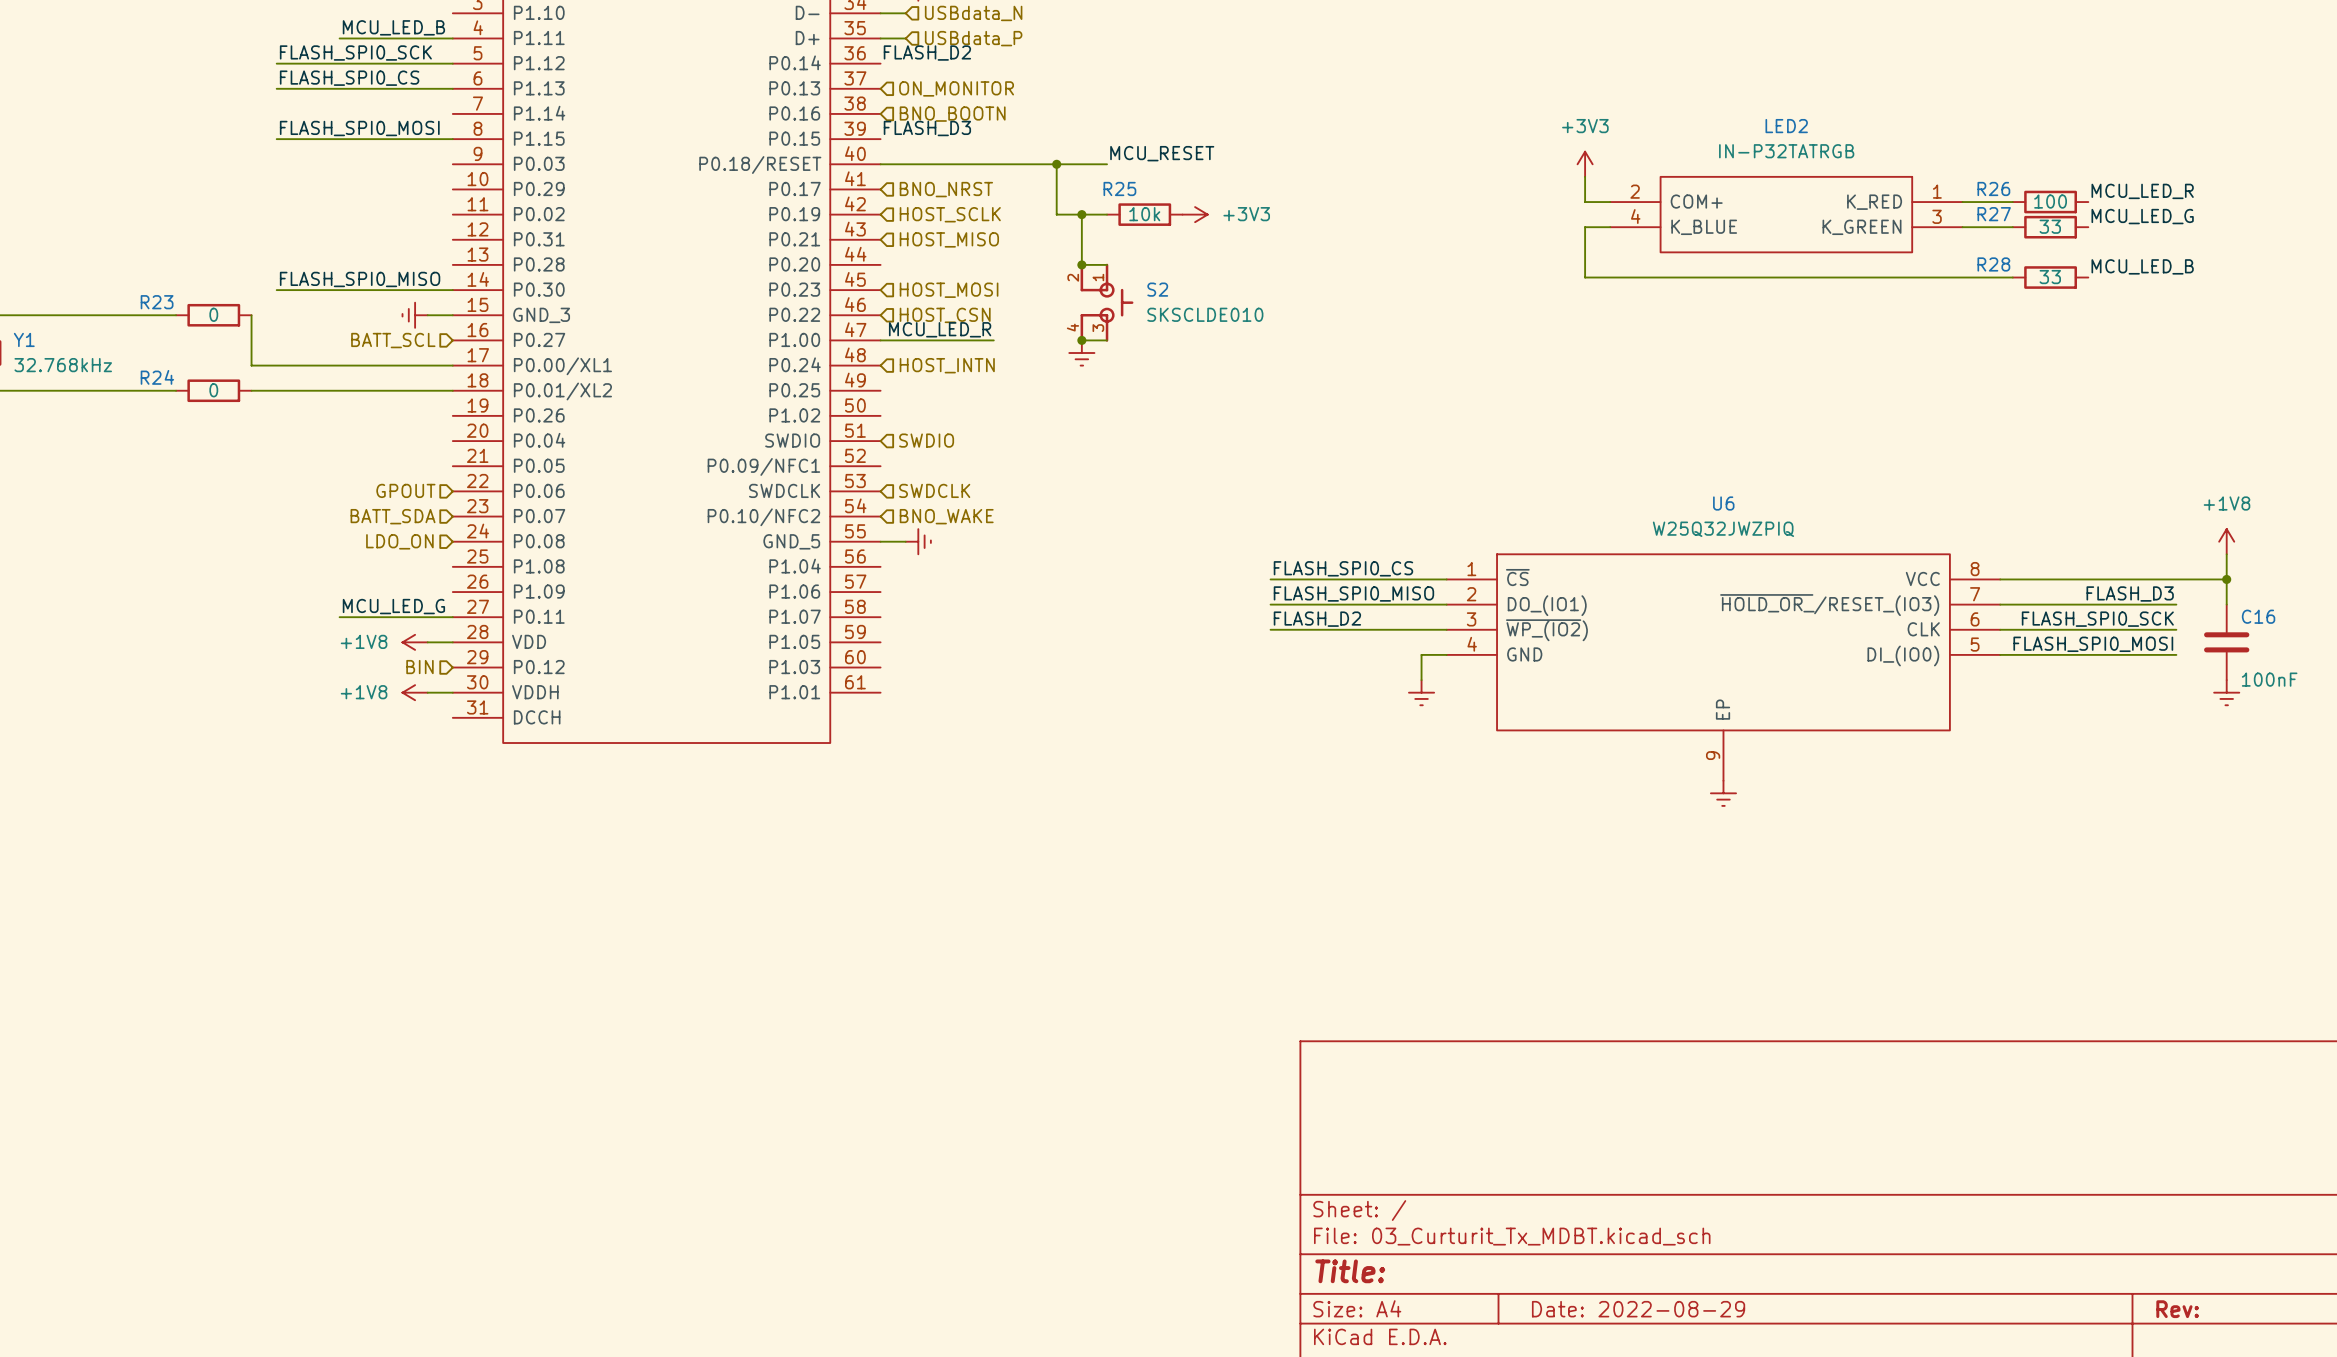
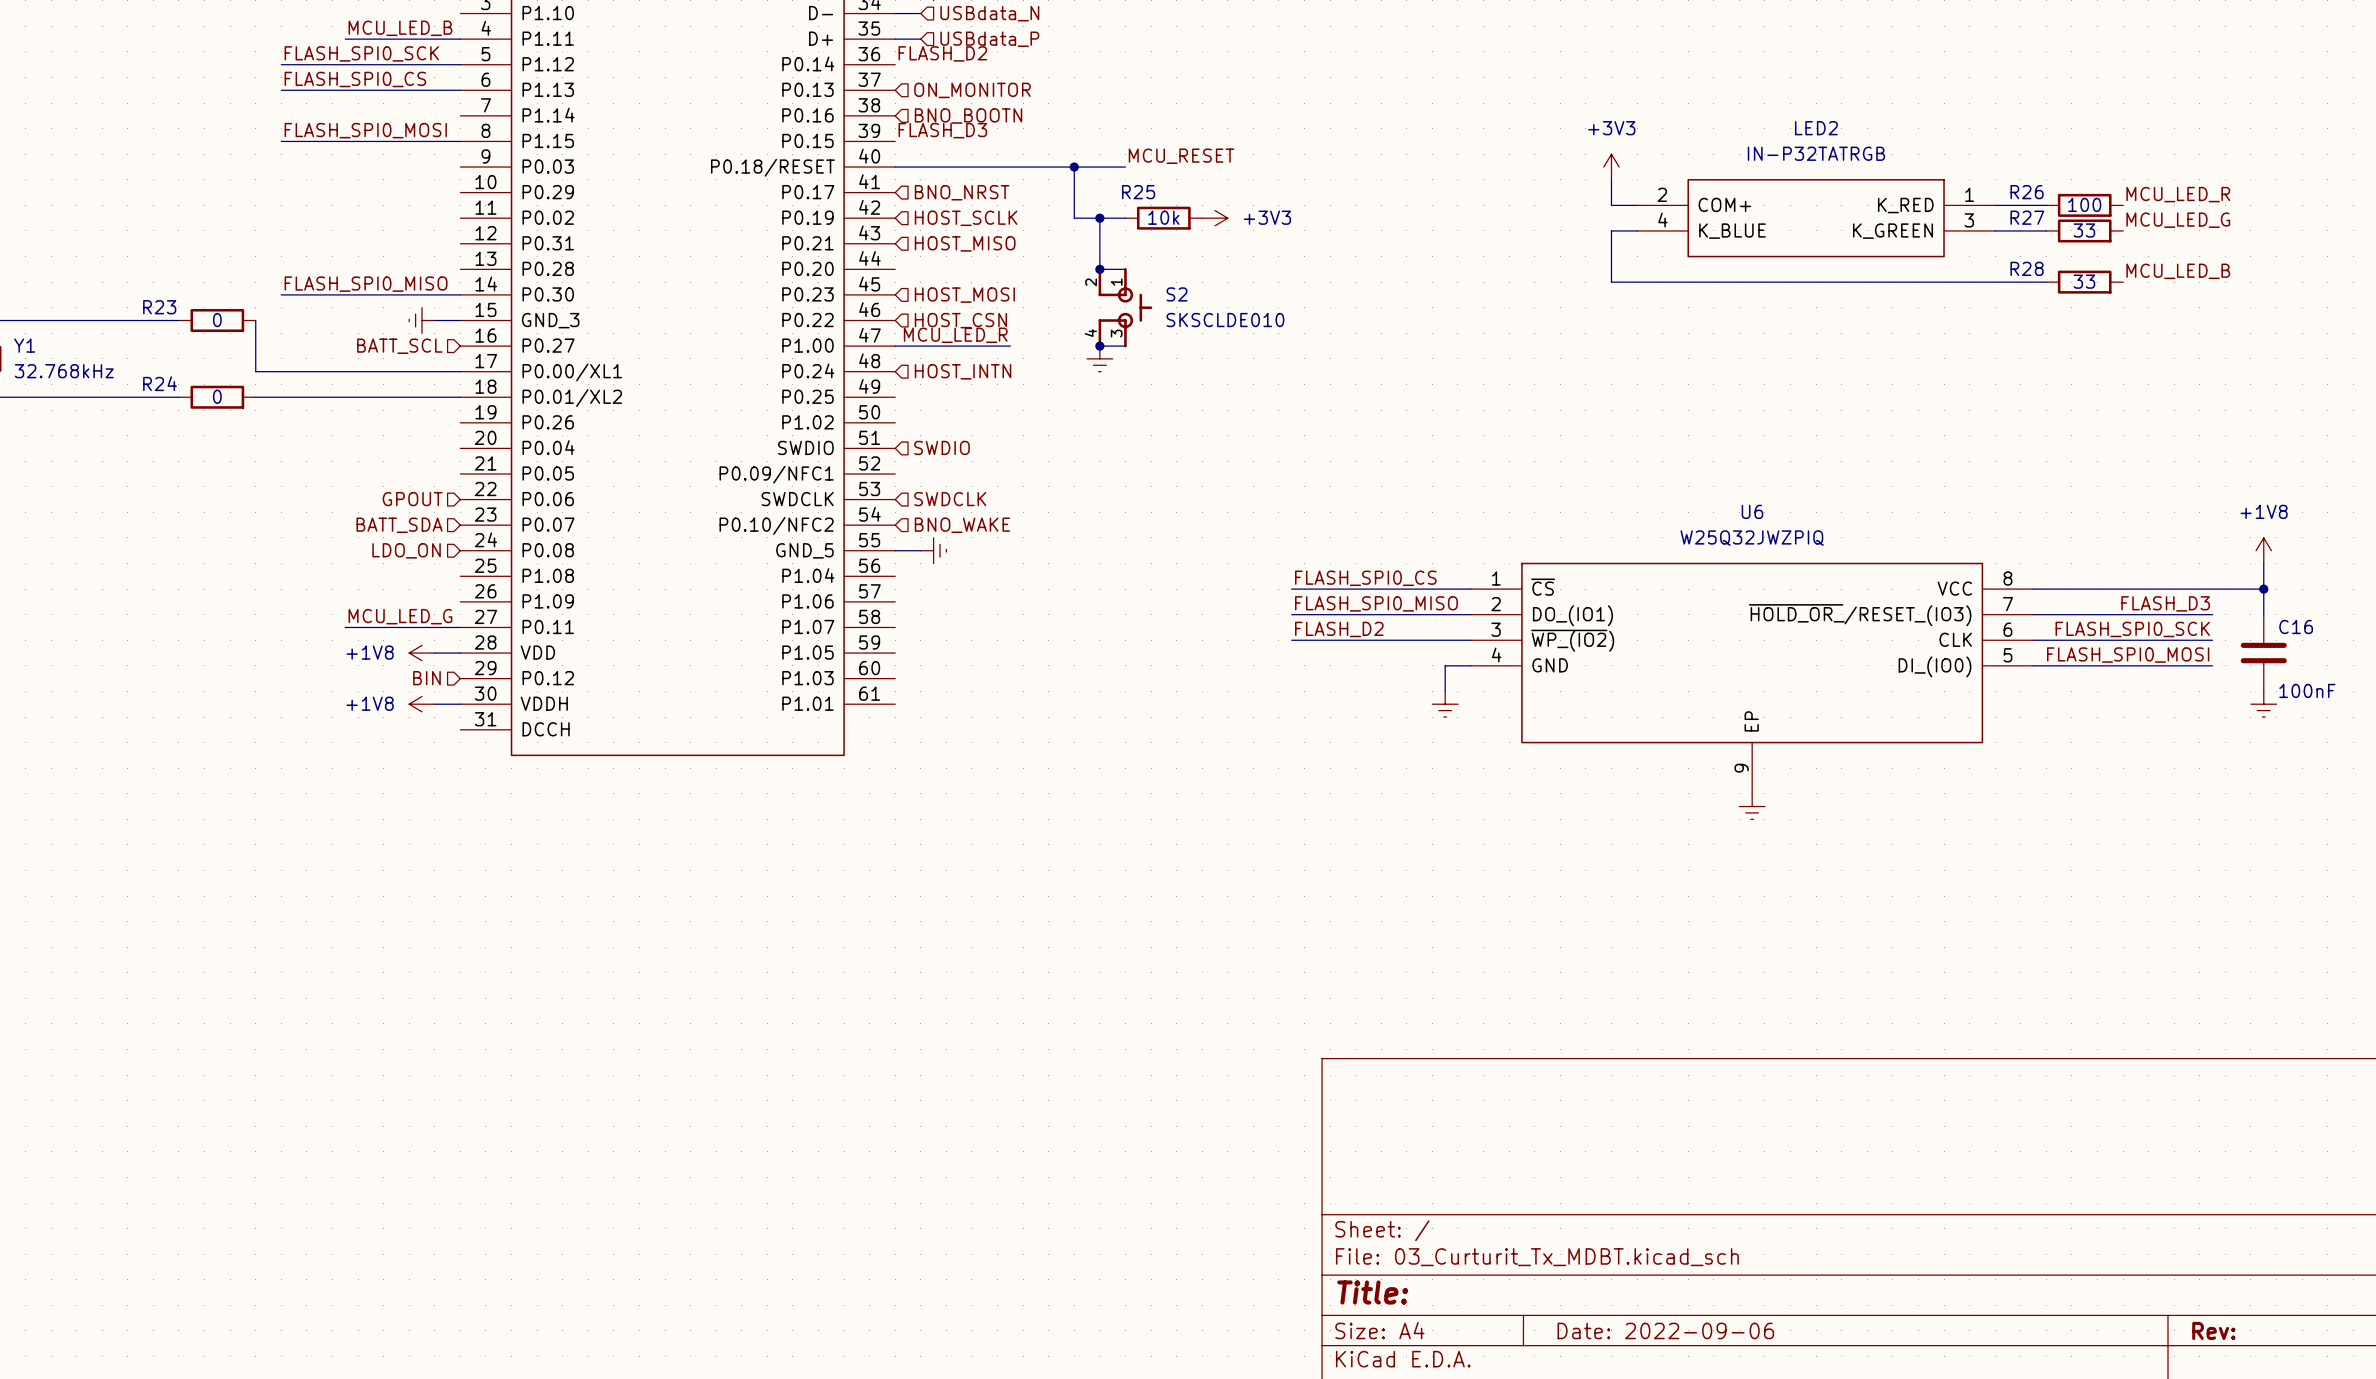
title block: Date: 2022-08-29 (1638, 1309) -> Date: 2022-09-06 (1665, 1330)

